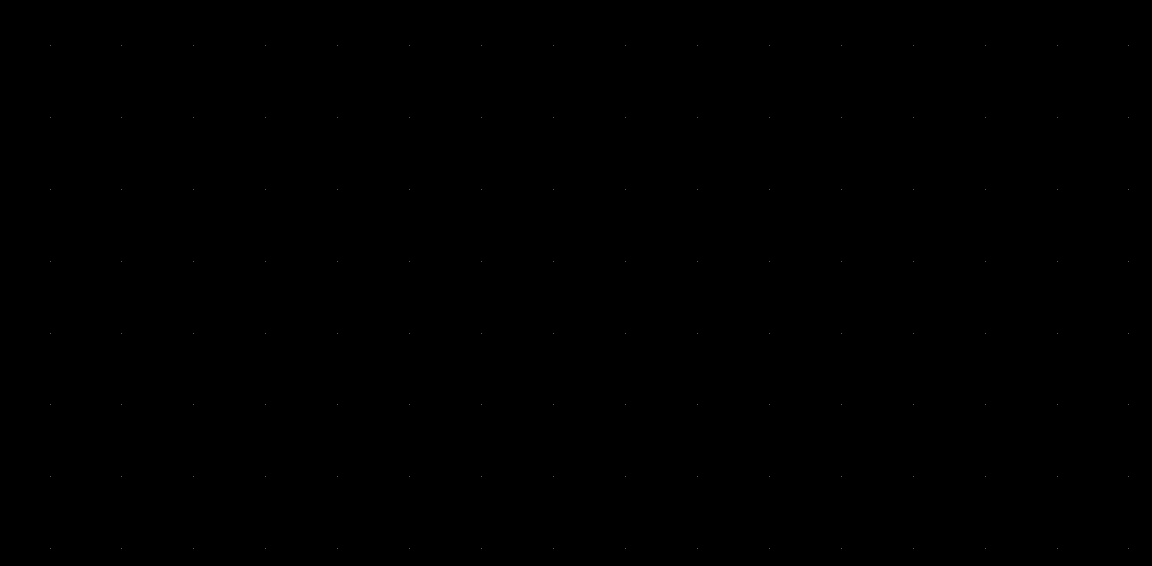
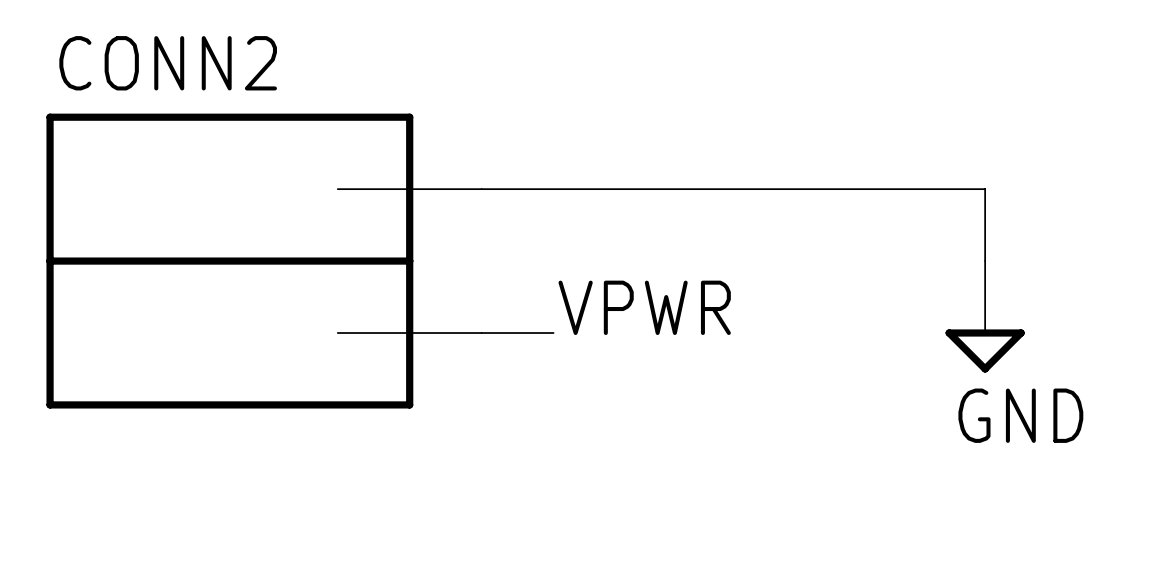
wire: none -> (481, 189) (985, 189) (985, 261)
CONN2: none -> (264, 261)
label: none -> VPWR (644, 307)
power symbol: none -> GND (985, 316)
wire: none -> (481, 333) (553, 333)

